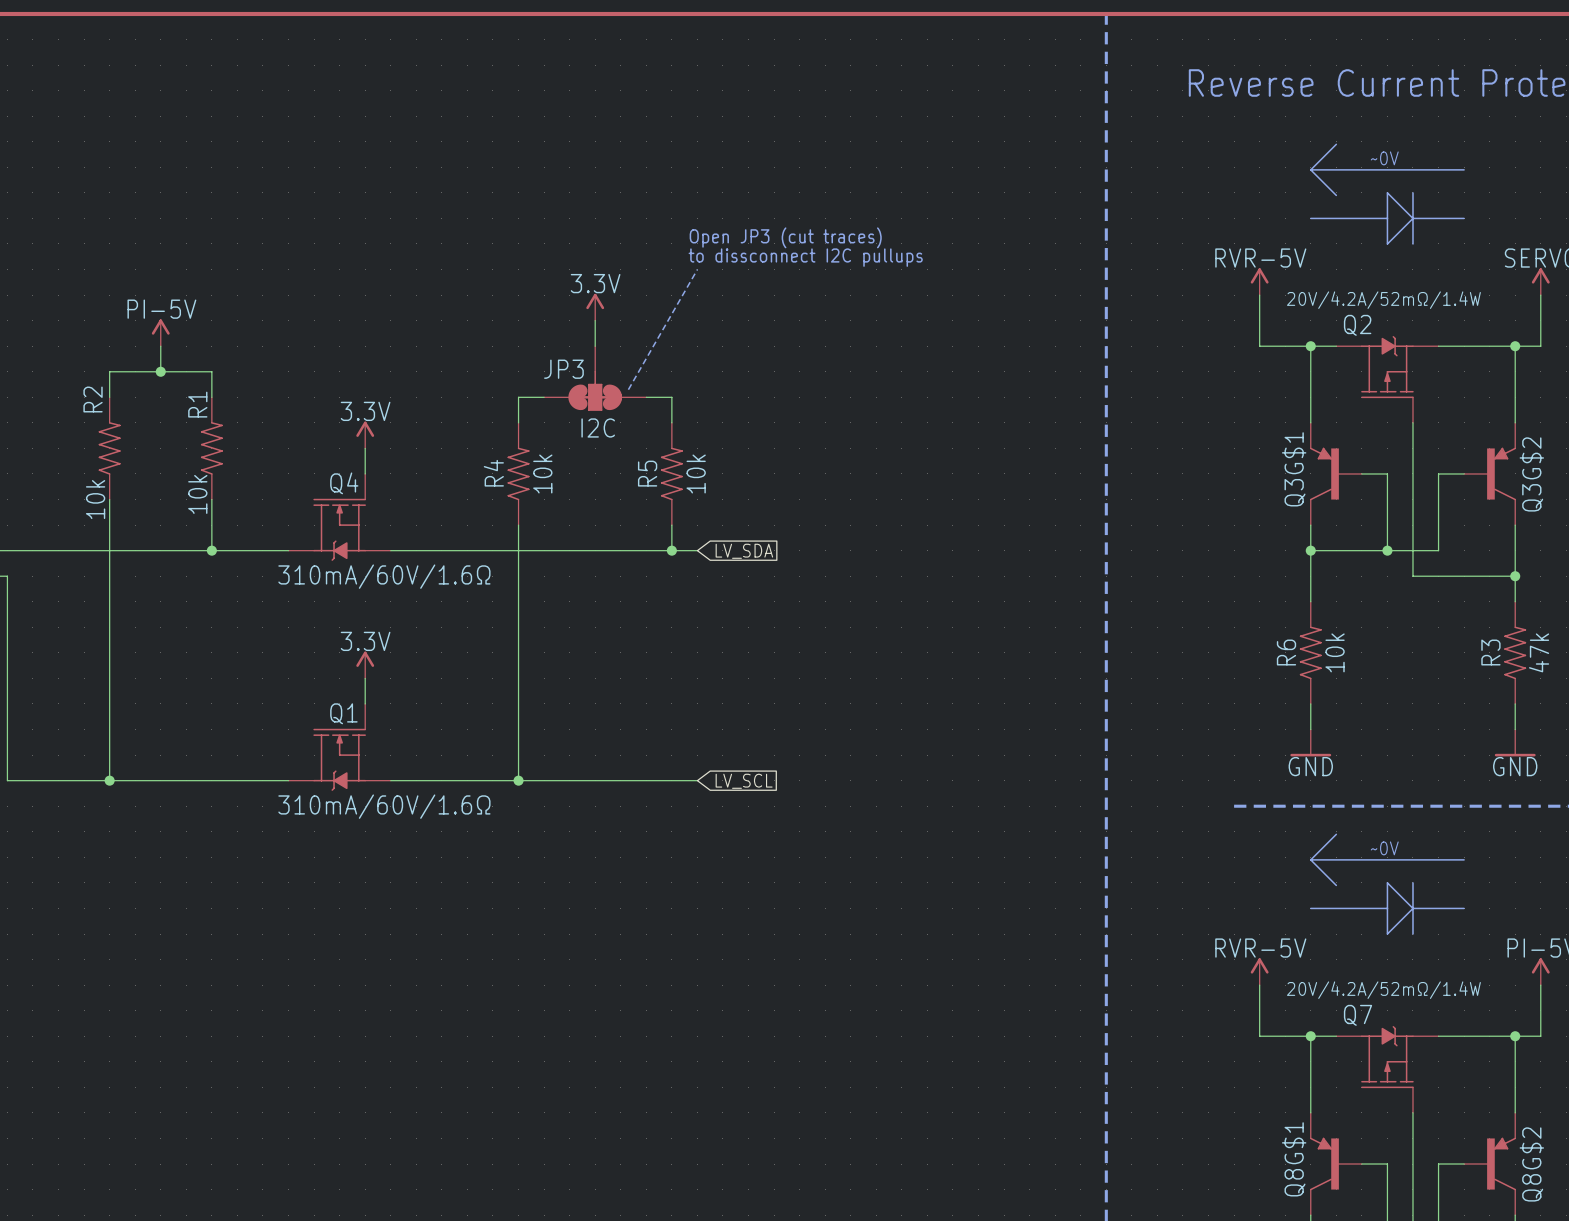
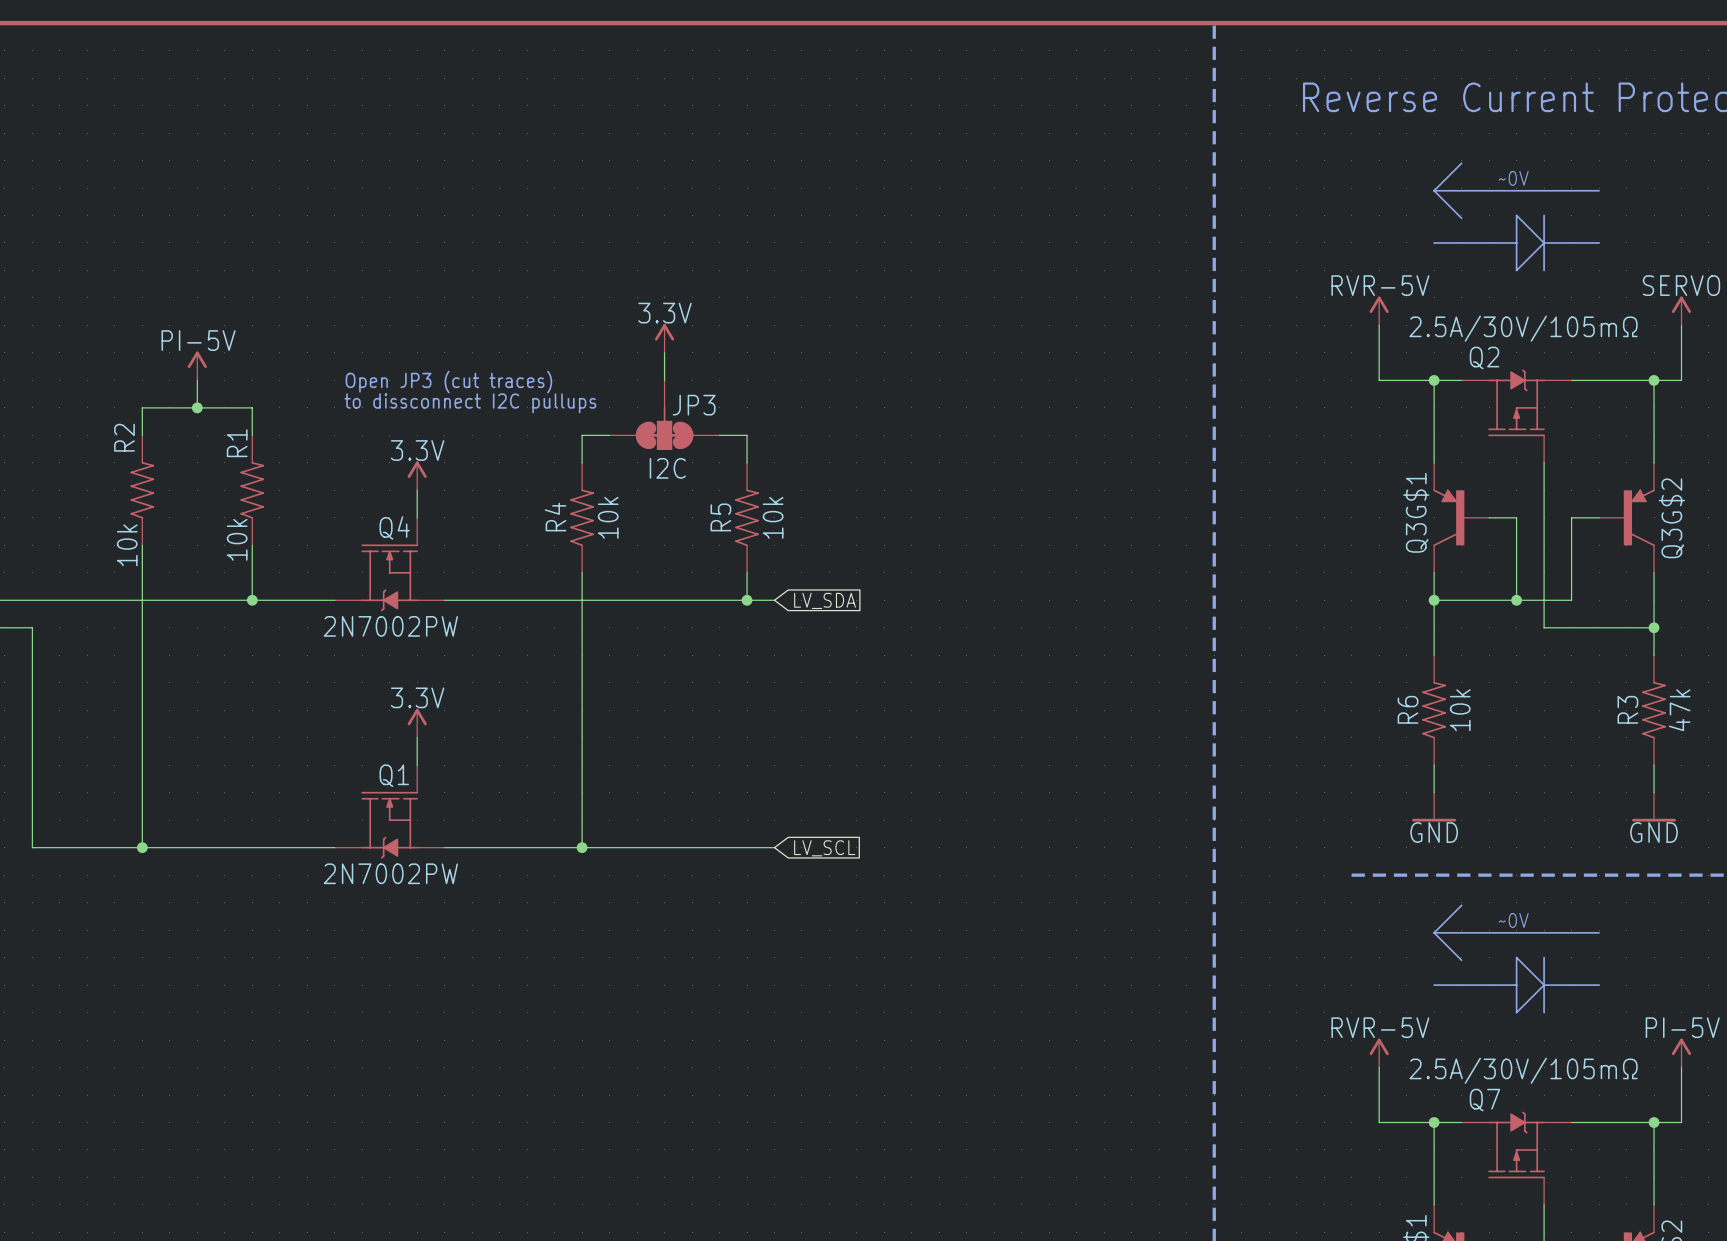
text: Open JP3 (cut traces) (785, 237) -> none
text: to dissconnect I2C pullups (805, 257) -> none
line: (697, 269) (628, 389) -> none
Q2 value: 20V/4.2A/52mΩ/1.4W (1383, 300) -> 2.5A/30V/105mΩ (1523, 328)
text: none -> Open JP3 (cut traces) (448, 382)
text: none -> to dissconnect I2C pullups (470, 403)
JP3 name position: JP3 (563, 369) -> JP3 (694, 405)
Q4 value: 310mA/60V/1.6Ω (384, 576) -> 2N7002PW (390, 626)
Q1 value: 310mA/60V/1.6Ω (384, 806) -> 2N7002PW (390, 873)
Q7 value: 20V/4.2A/52mΩ/1.4W (1383, 990) -> 2.5A/30V/105mΩ (1523, 1070)

